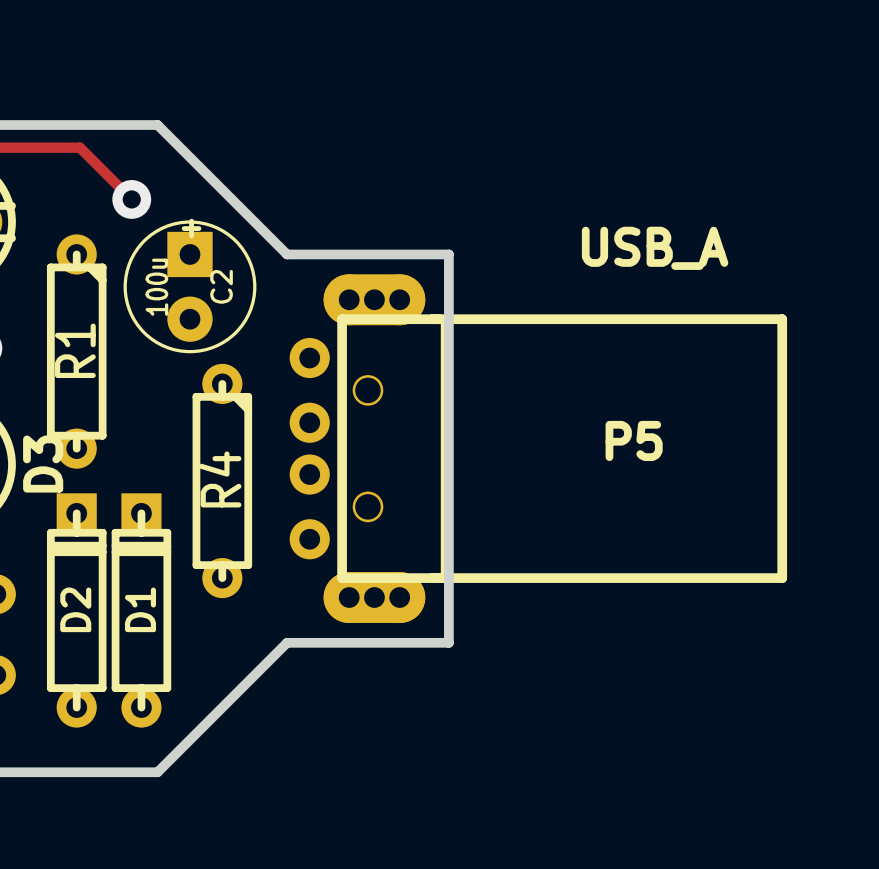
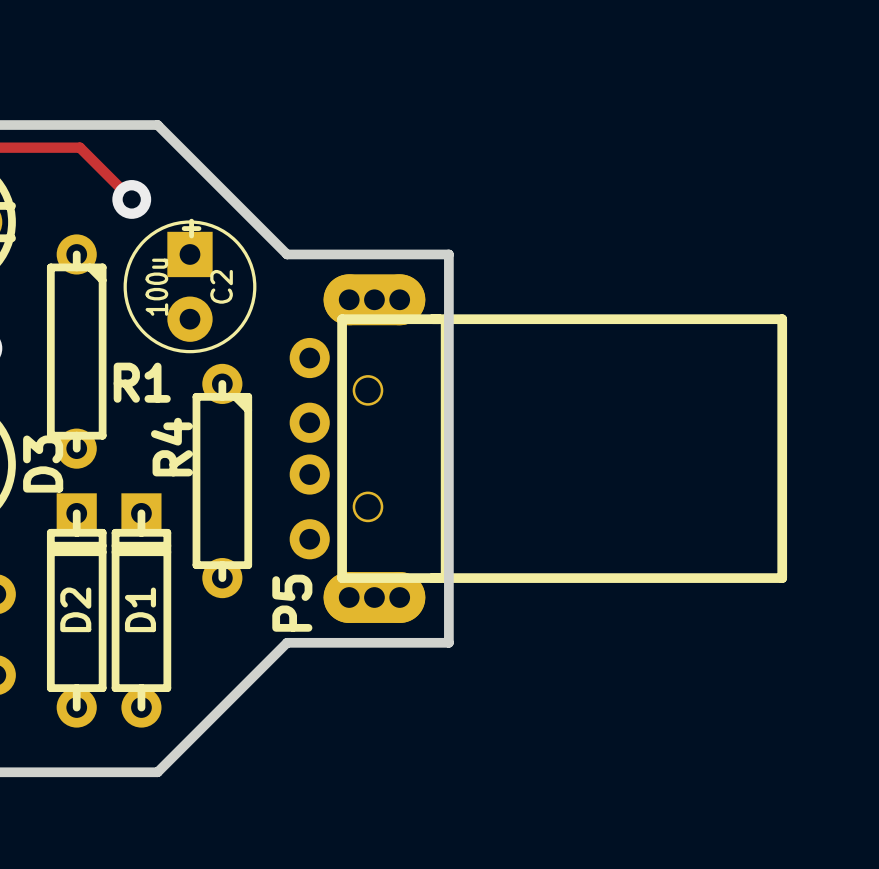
P5 value: USB_A (655, 248) -> none
R1 name rotation: 0° (75, 350) -> 90° clockwise (142, 382)
P5 name rotation: 0° (634, 440) -> 90° counterclockwise (292, 603)
P5 name position: P5 (634, 440) -> P5 (292, 603)
R4 name position: R4 (220, 479) -> R4 (171, 447)

